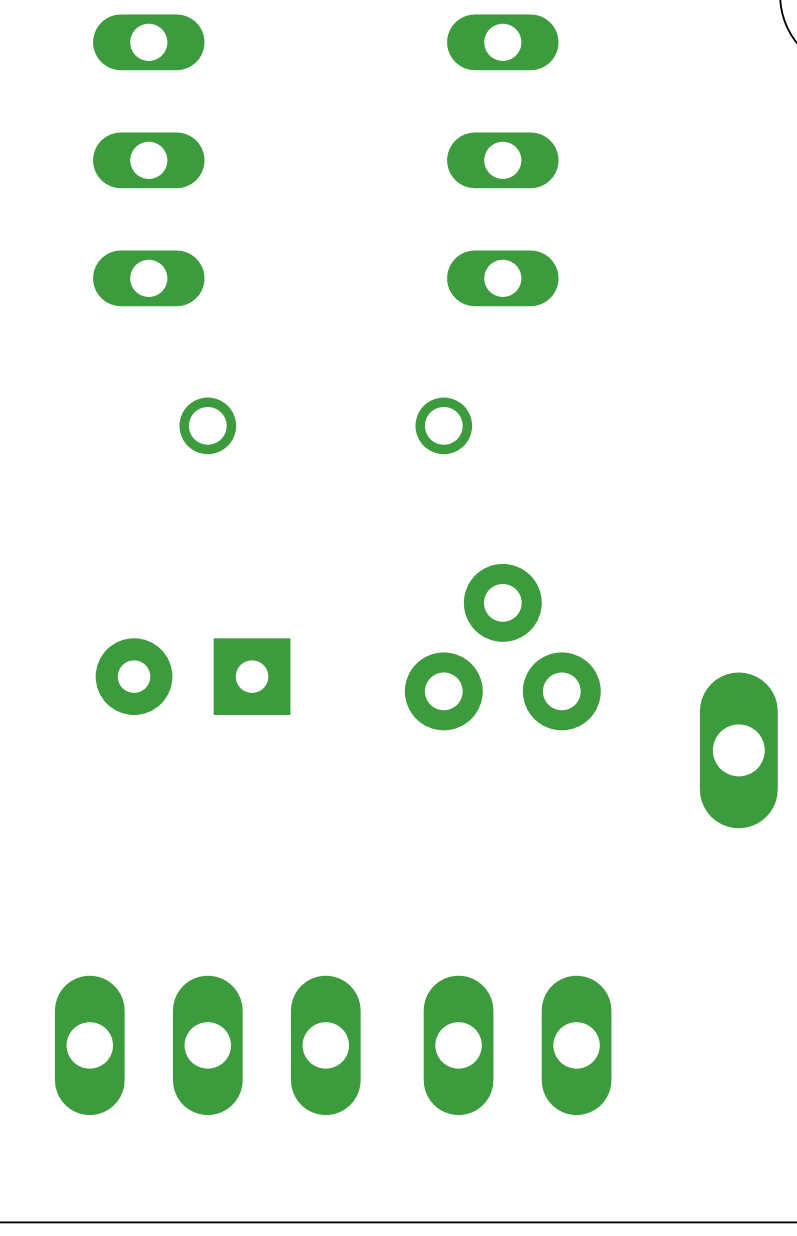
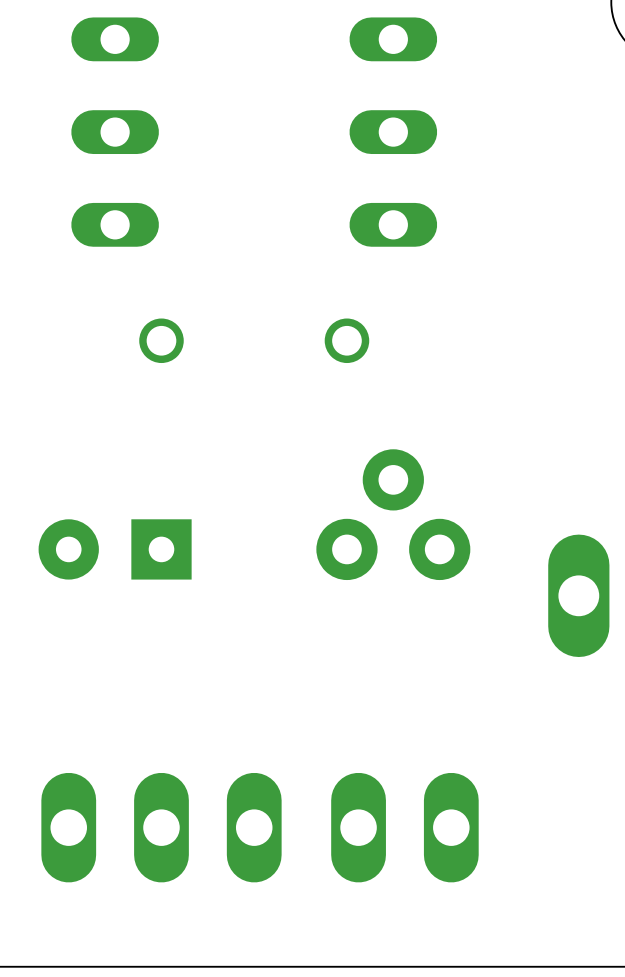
part position: (193, 676) -> (115, 549)

